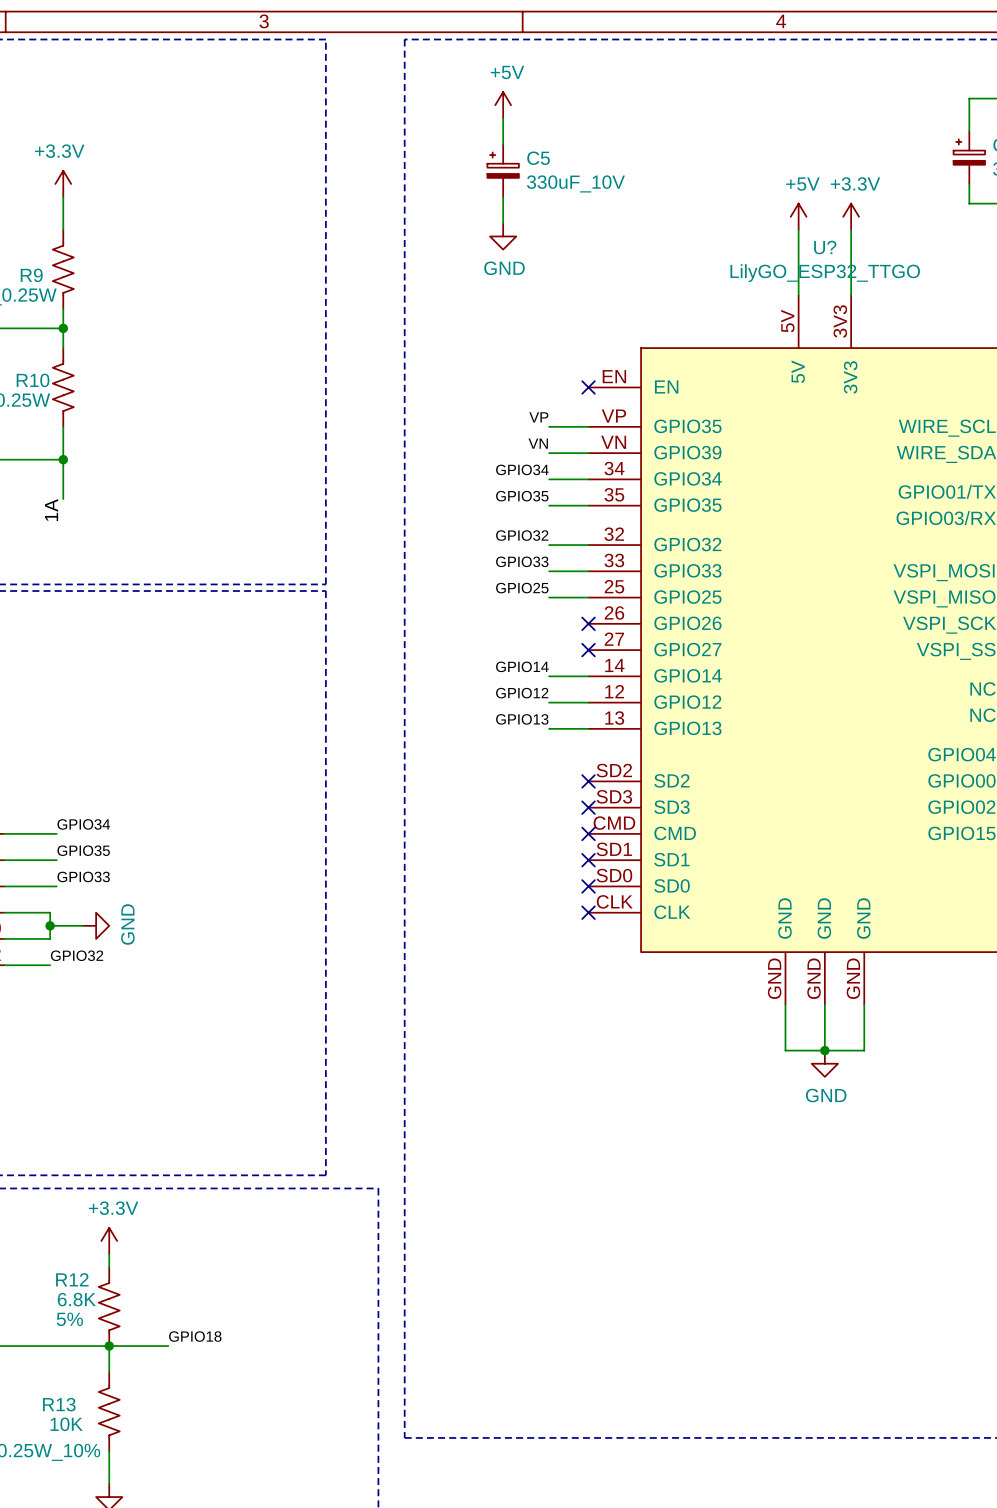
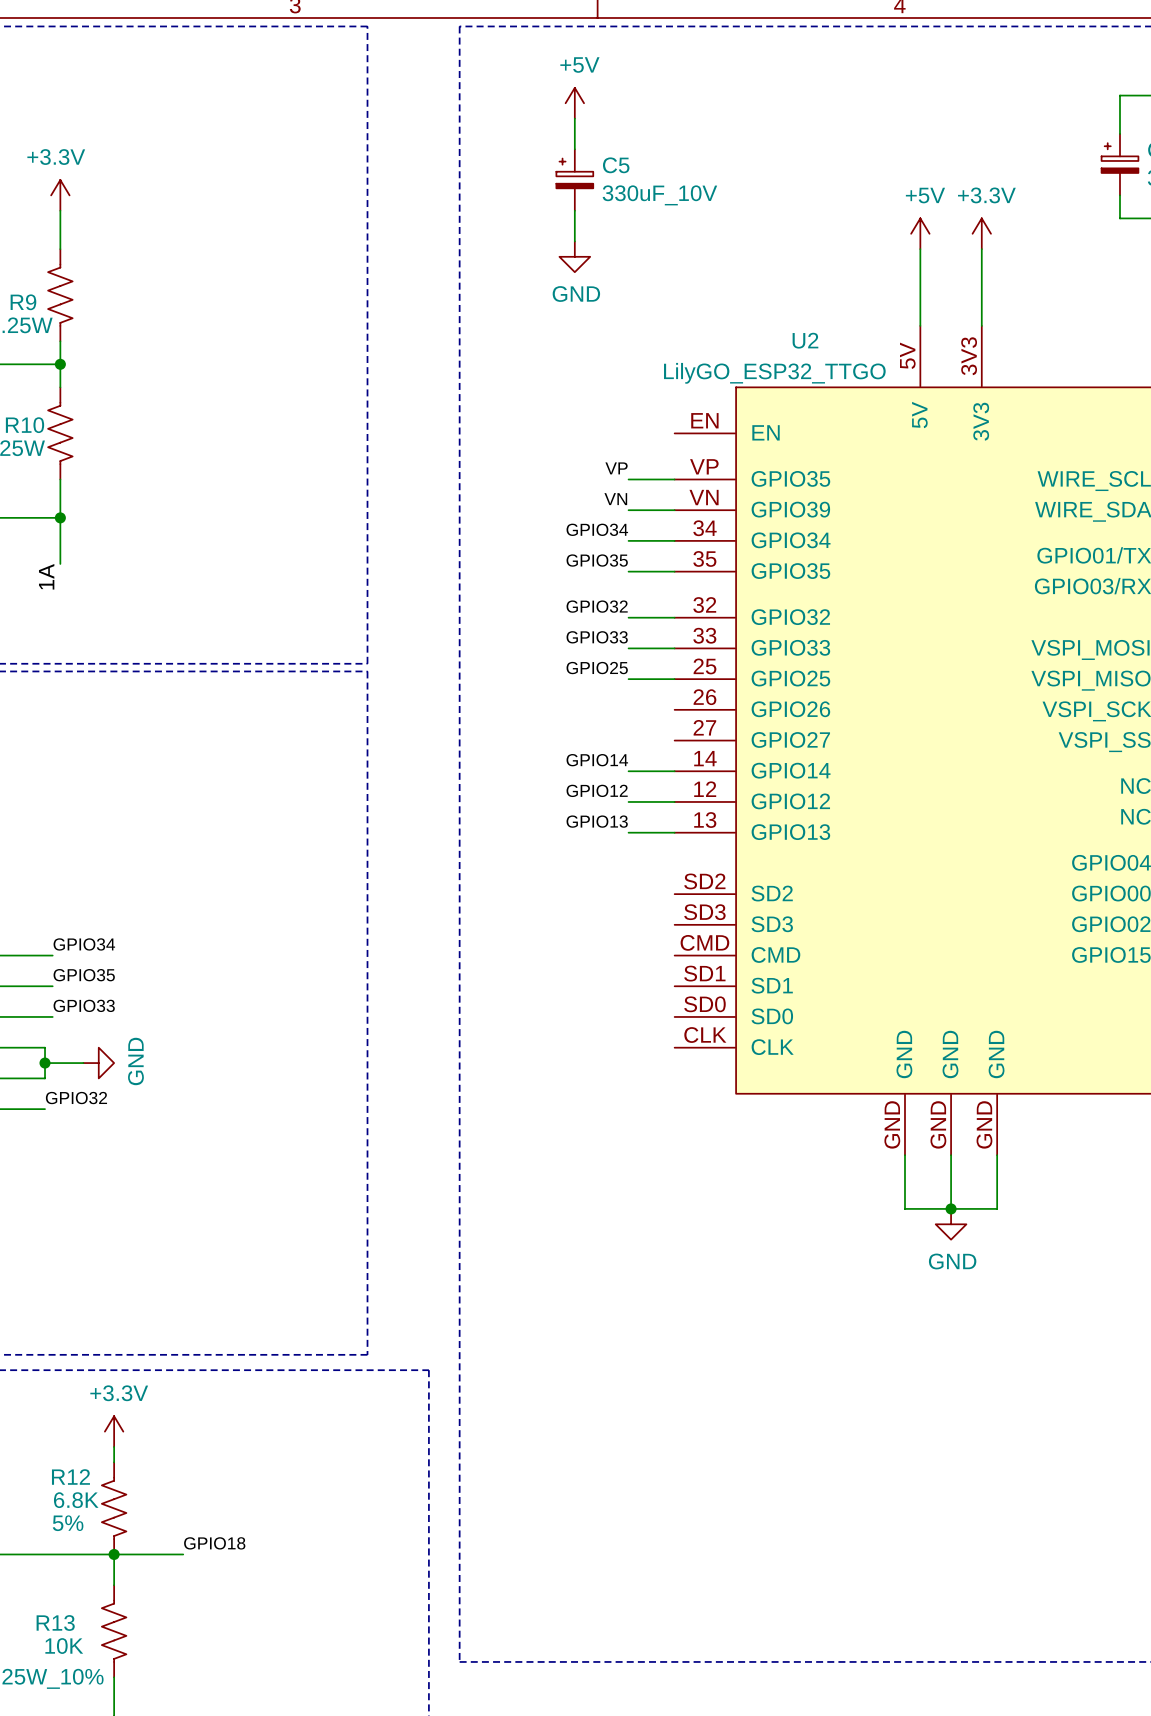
U? name: U? (825, 247) -> U2 (805, 340)
U? value position: LilyGO_ESP32_TTGO (825, 273) -> LilyGO_ESP32_TTGO (774, 373)
no-connect mark: (588, 387) -> none
no-connect mark: (588, 623) -> none
no-connect mark: (588, 650) -> none
no-connect mark: (588, 781) -> none
no-connect mark: (588, 807) -> none
no-connect mark: (588, 833) -> none
no-connect mark: (588, 860) -> none
no-connect mark: (588, 886) -> none
no-connect mark: (588, 912) -> none

